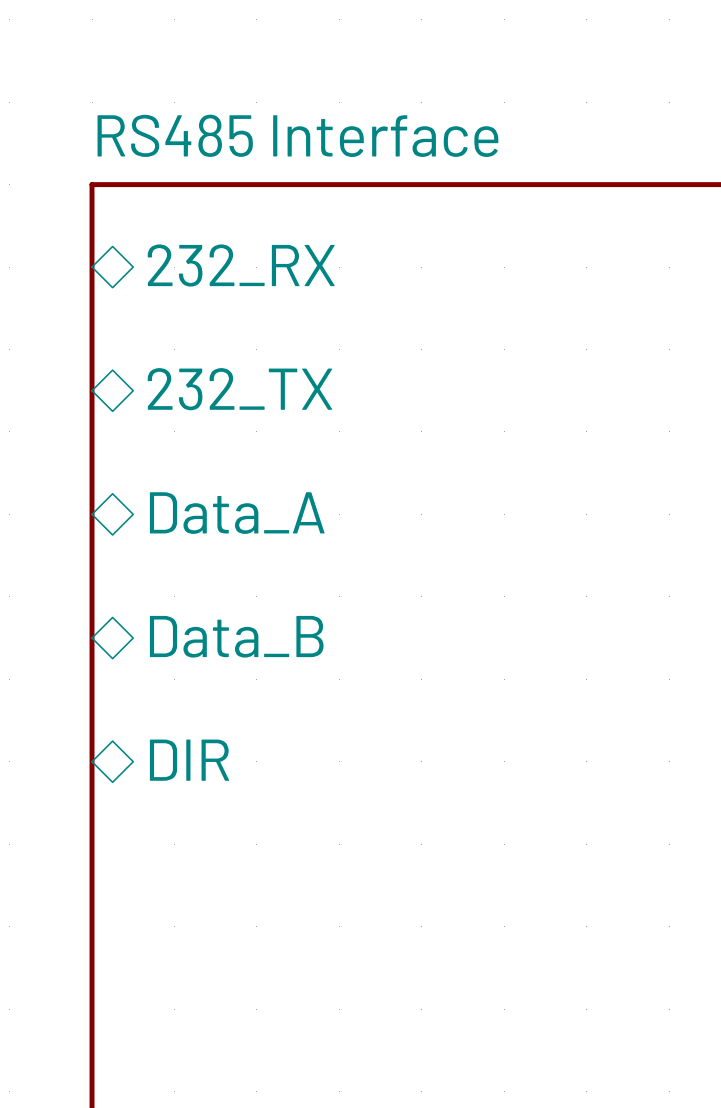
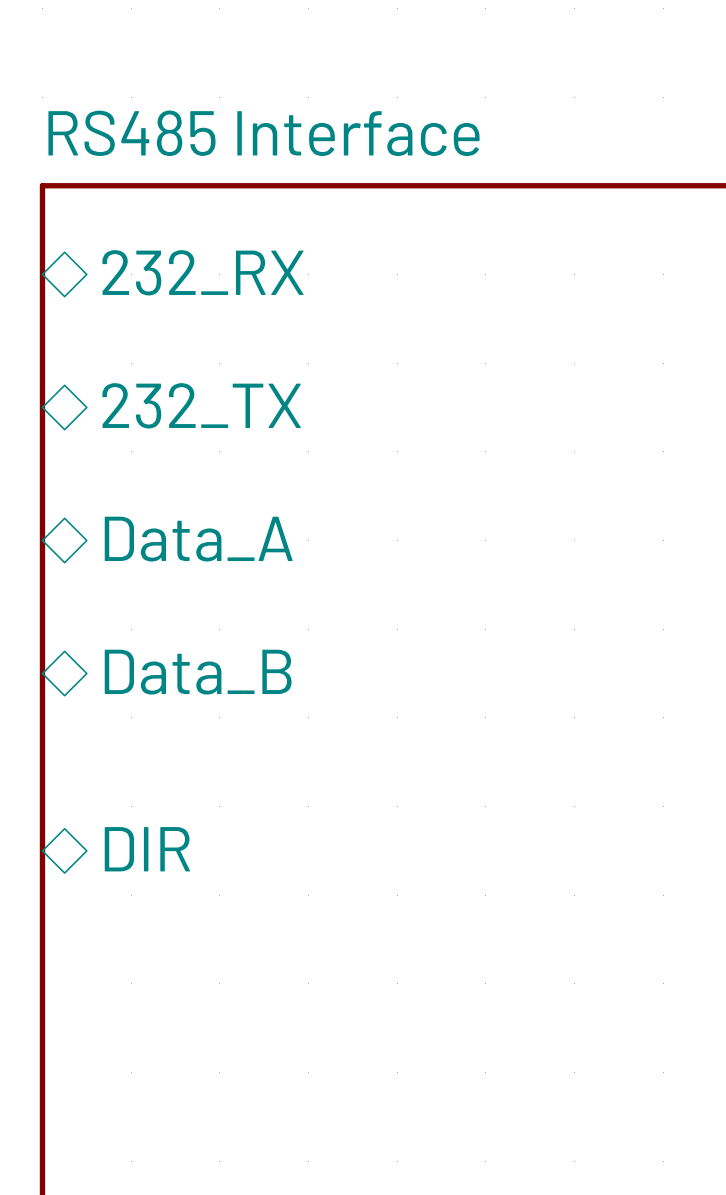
sheet pin position: DIR (189, 760) -> DIR (147, 849)

